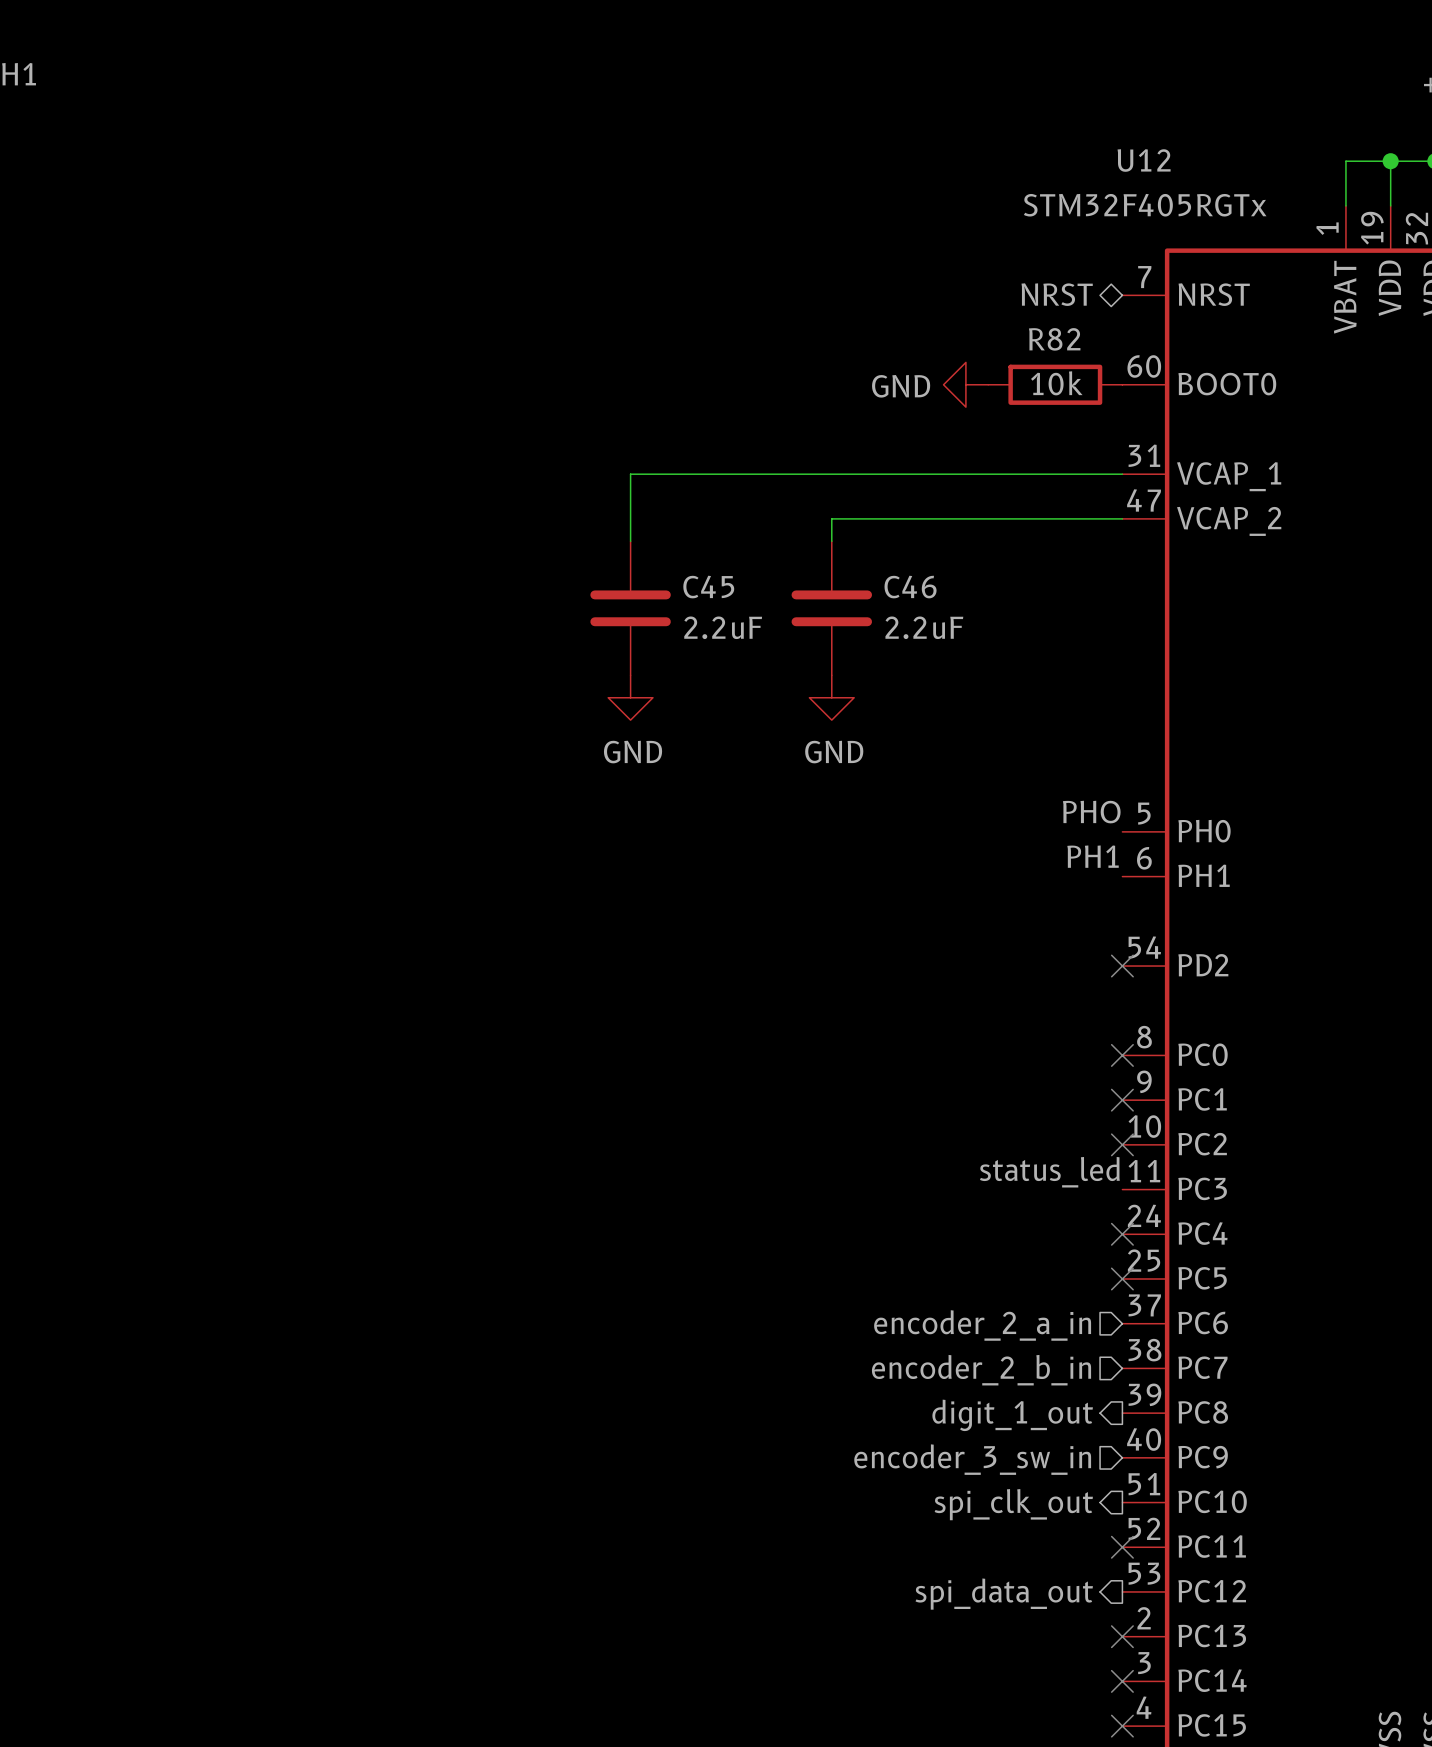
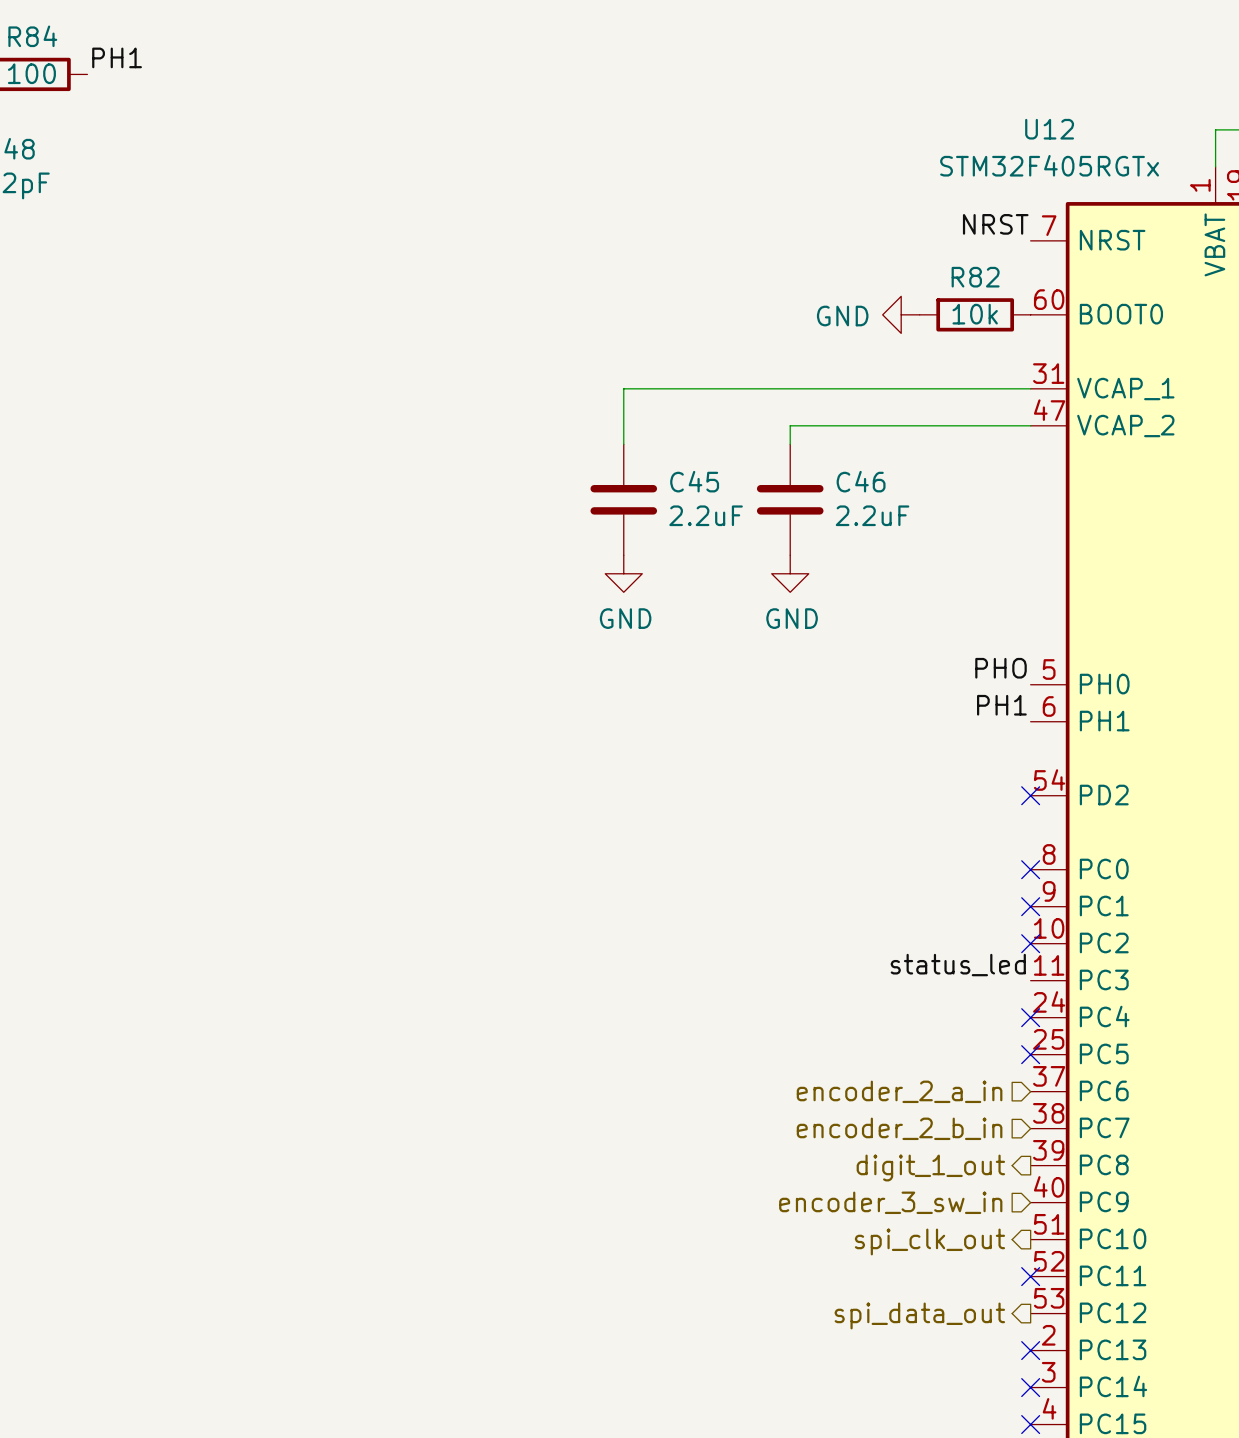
label: none -> NRST (995, 224)
hierarchical label: NRST (1057, 294) -> none

